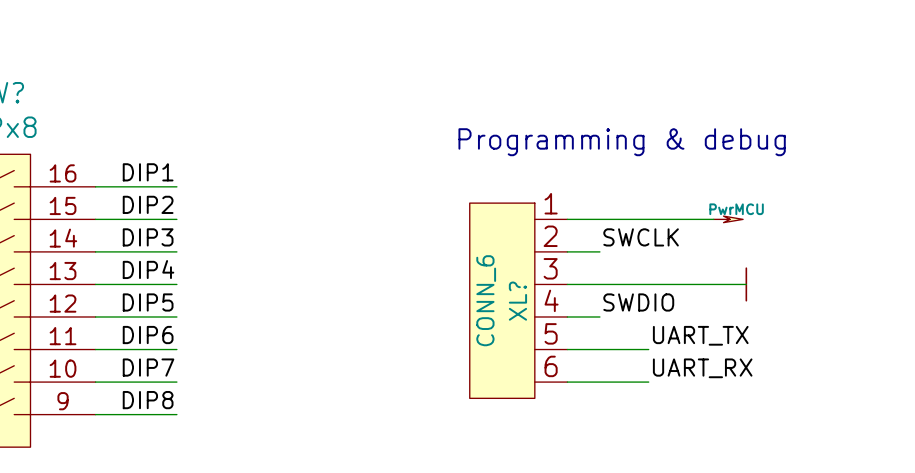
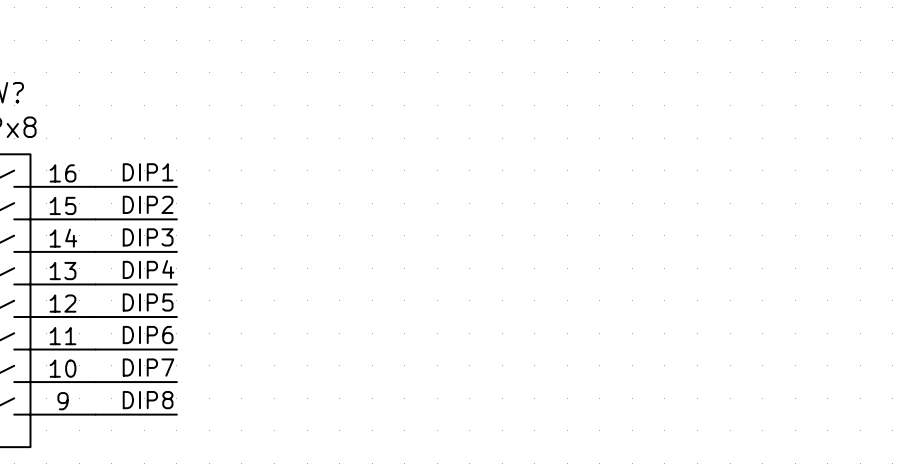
text: Programming & debug (622, 142) -> none
wire: (567, 219) (713, 219) -> none
power symbol: PwrMCU (728, 219) -> none
label: SWCLK (641, 237) -> none
wire: (567, 251) (599, 251) -> none
wire: (567, 284) (746, 284) -> none
power symbol: (746, 284) -> none
XL?: CONN_6 (518, 300) -> none
label: SWDIO (638, 302) -> none
wire: (567, 316) (599, 316) -> none
label: UART_TX (700, 335) -> none
wire: (567, 349) (648, 349) -> none
label: UART_RX (702, 368) -> none
wire: (567, 382) (648, 382) -> none

